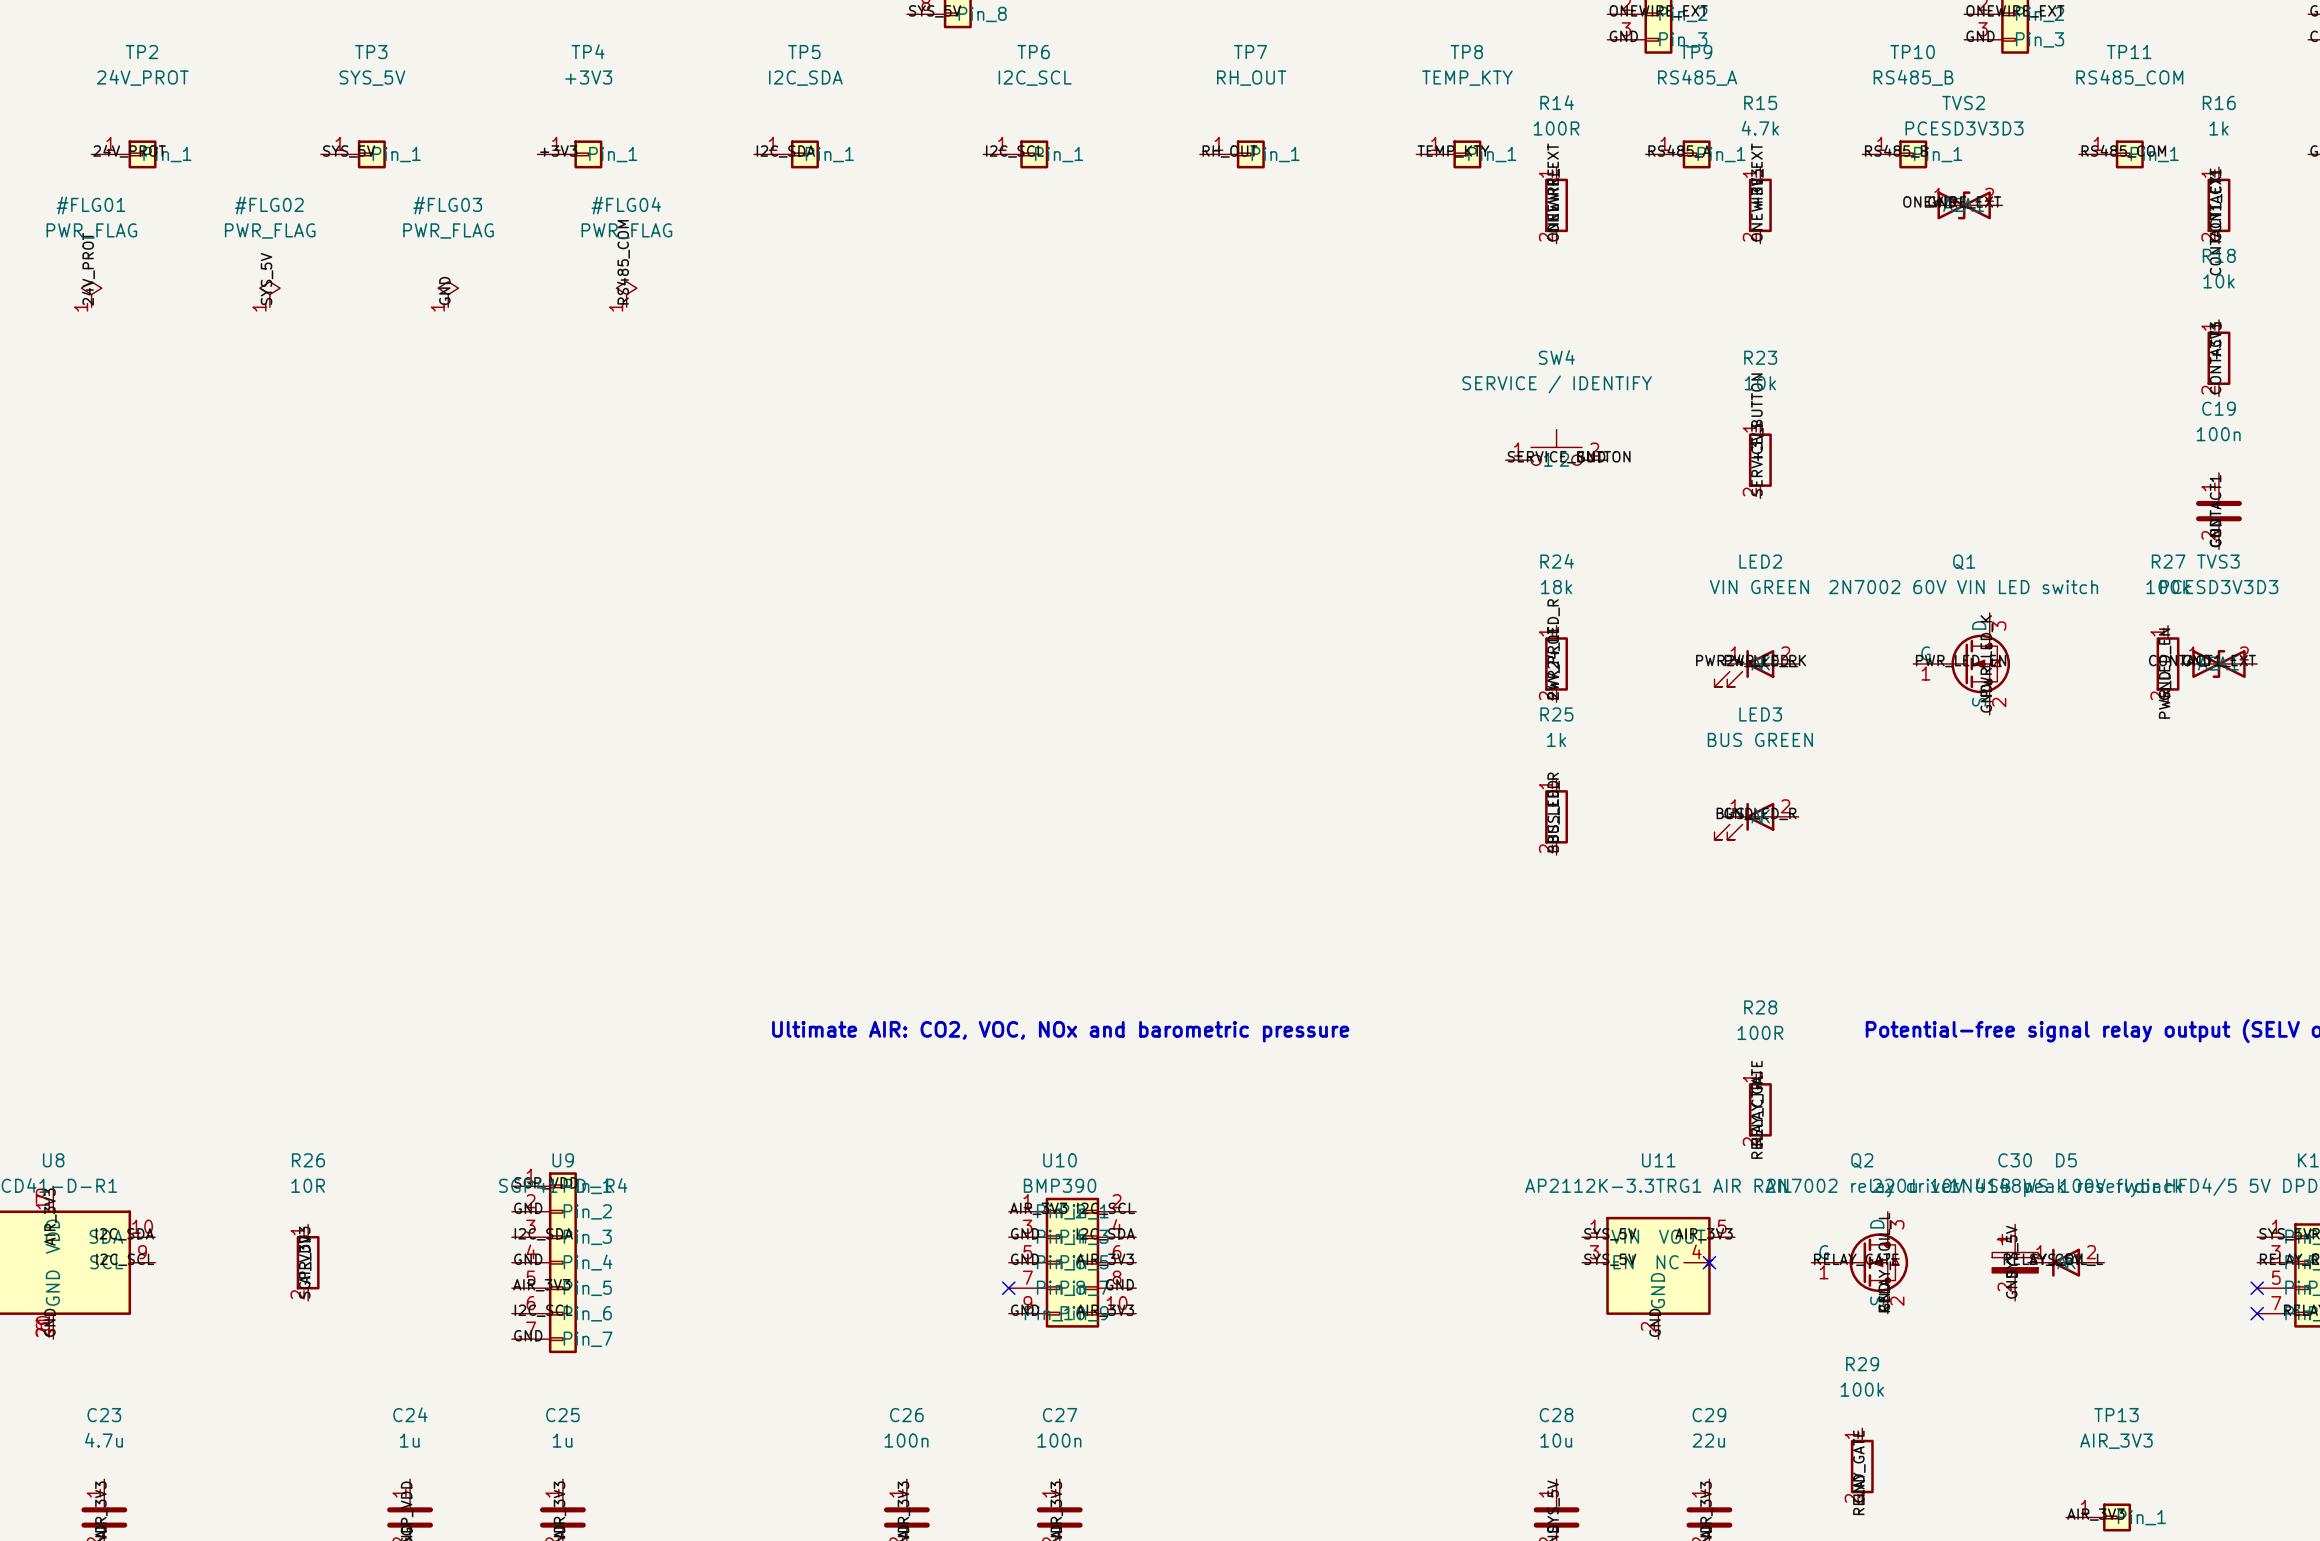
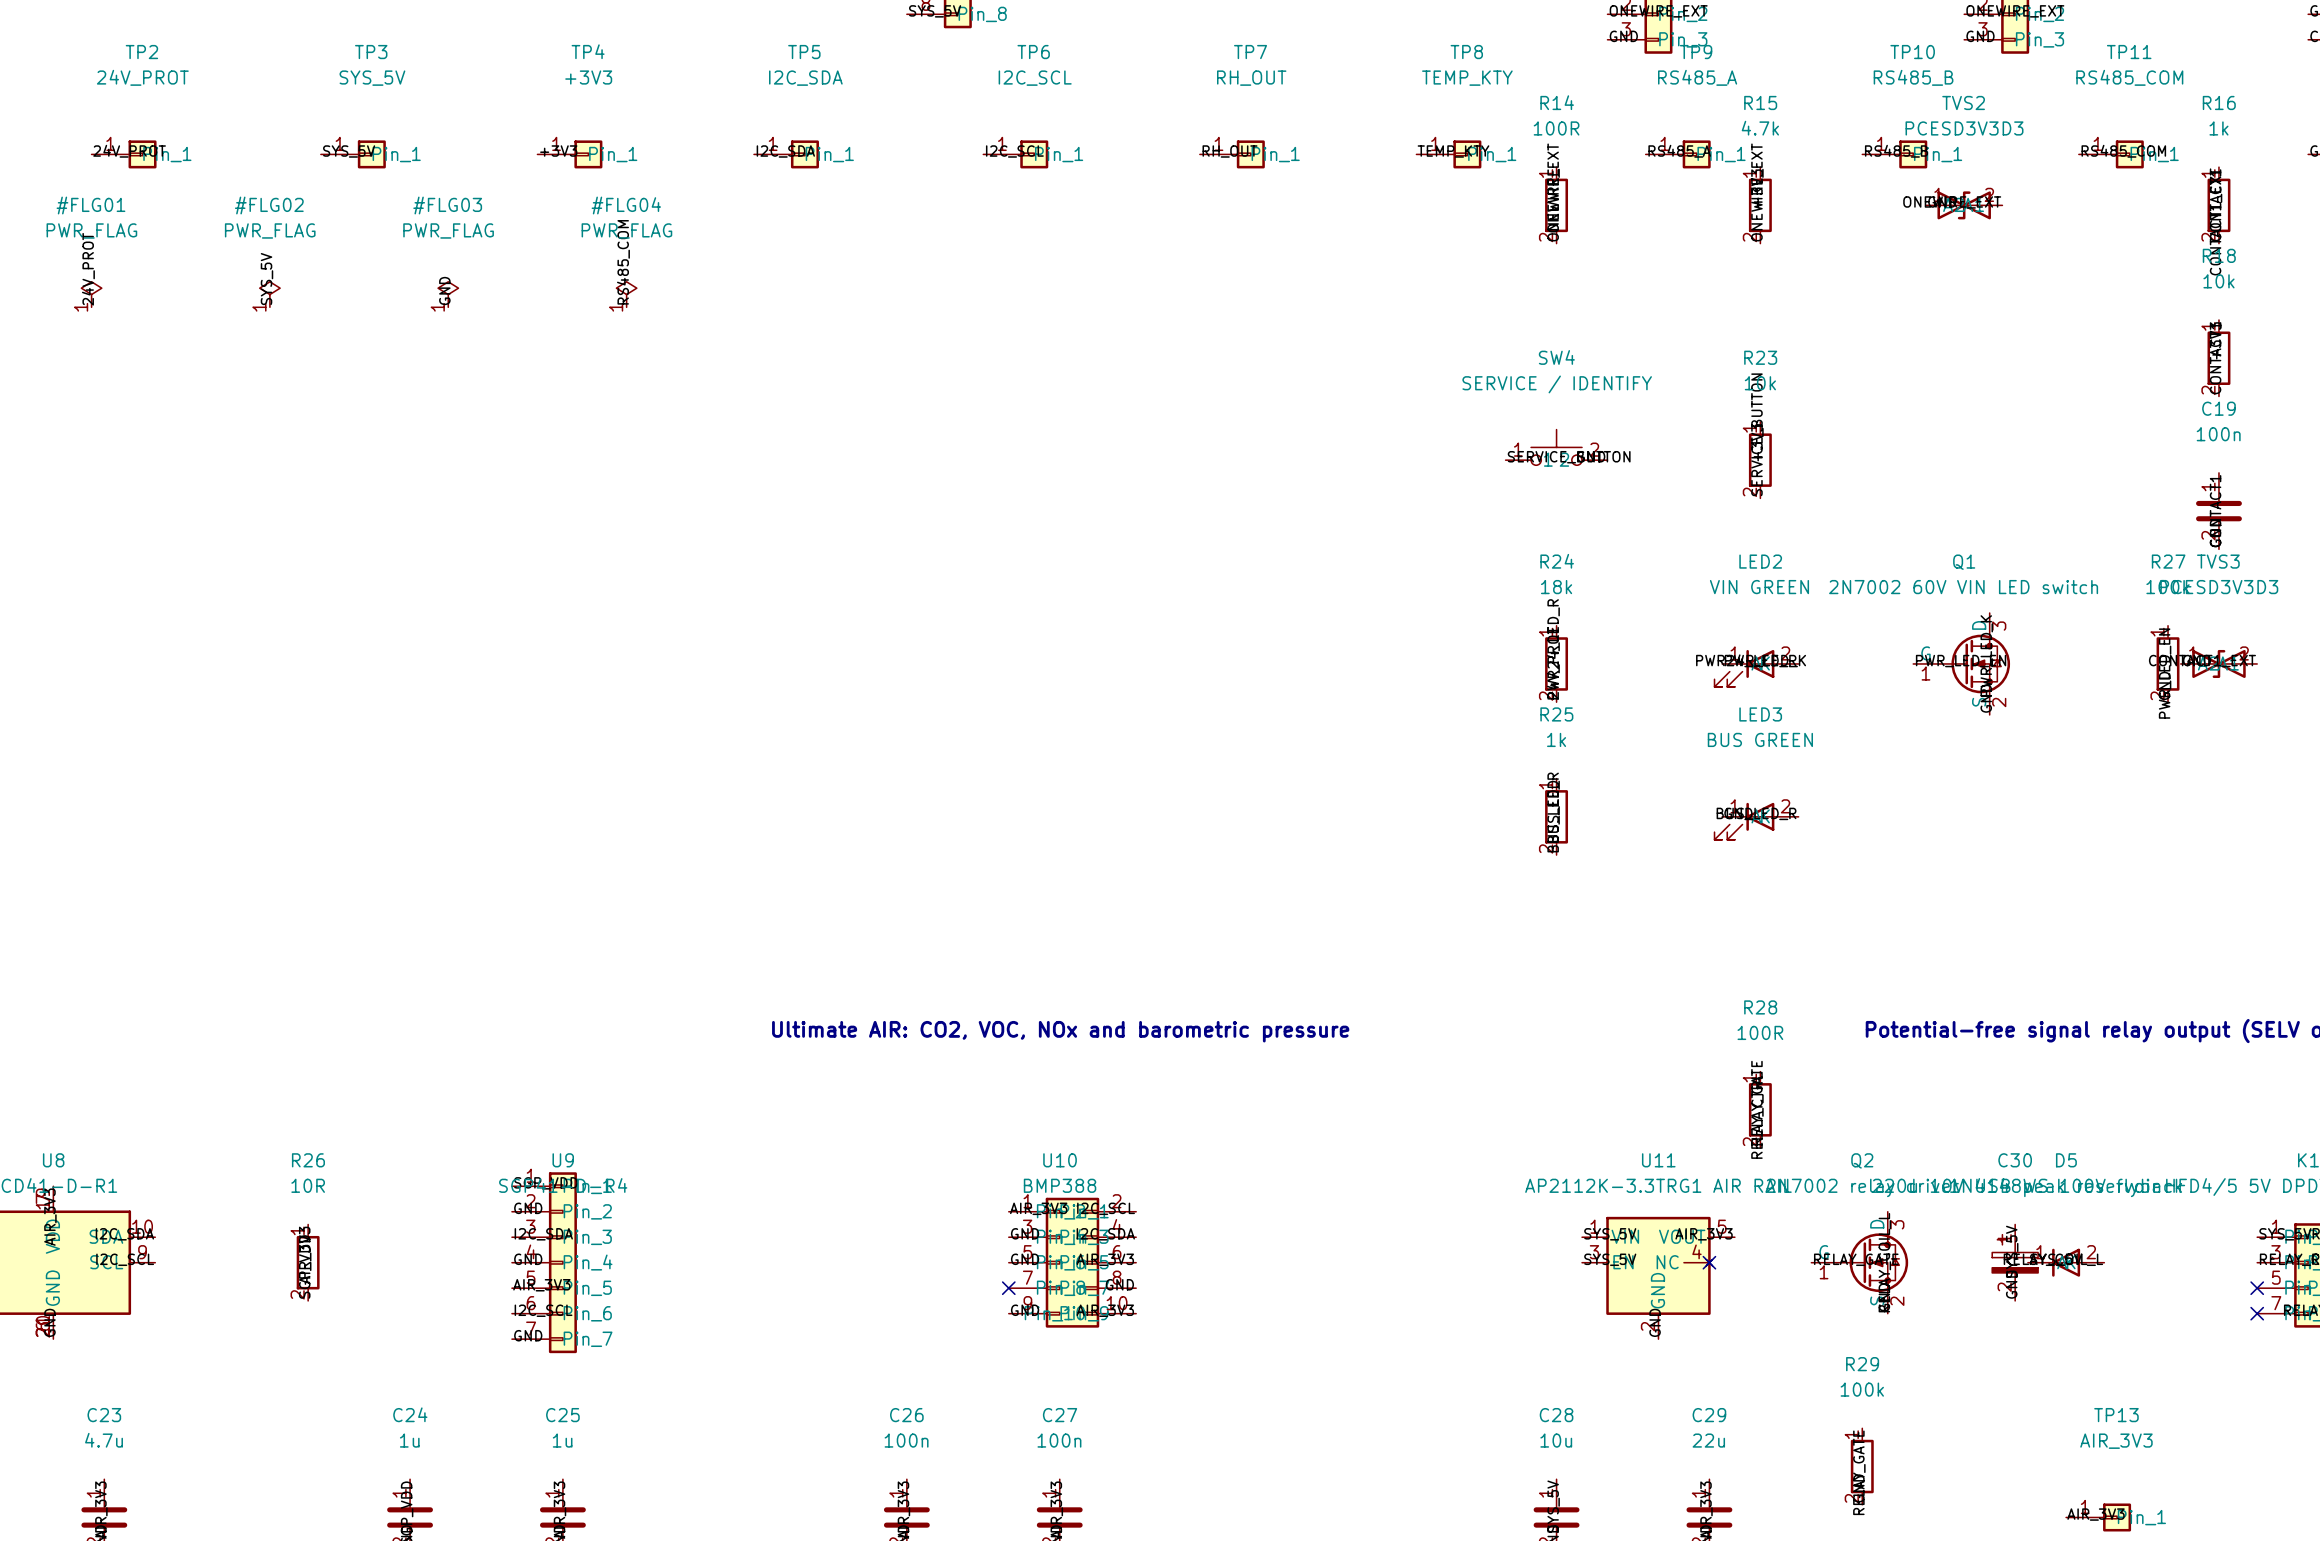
U10 value: BMP390 (1060, 1185) -> BMP388 (1060, 1185)

